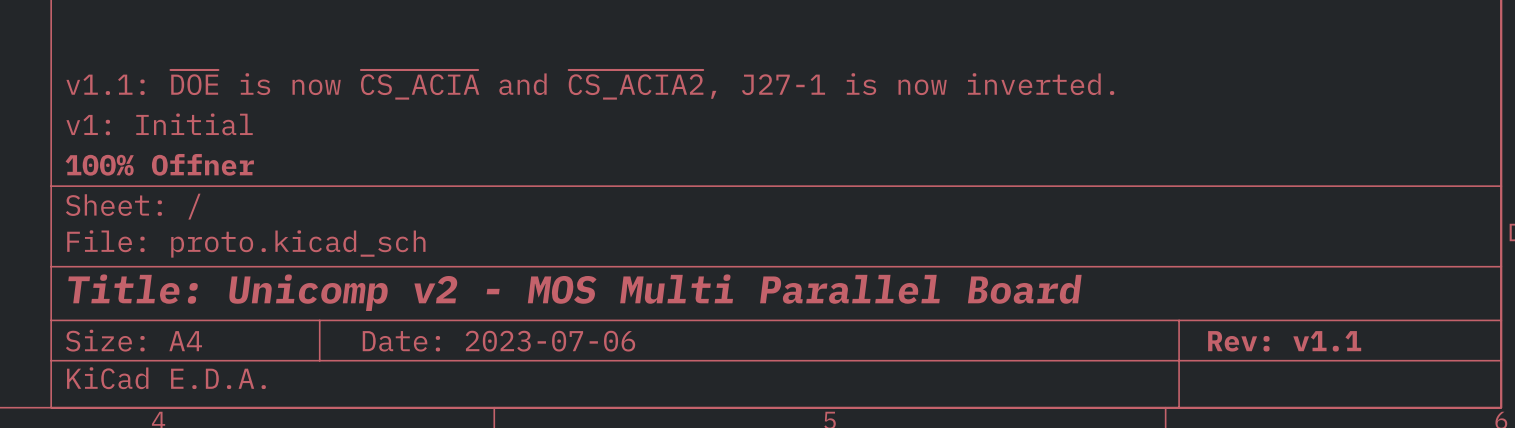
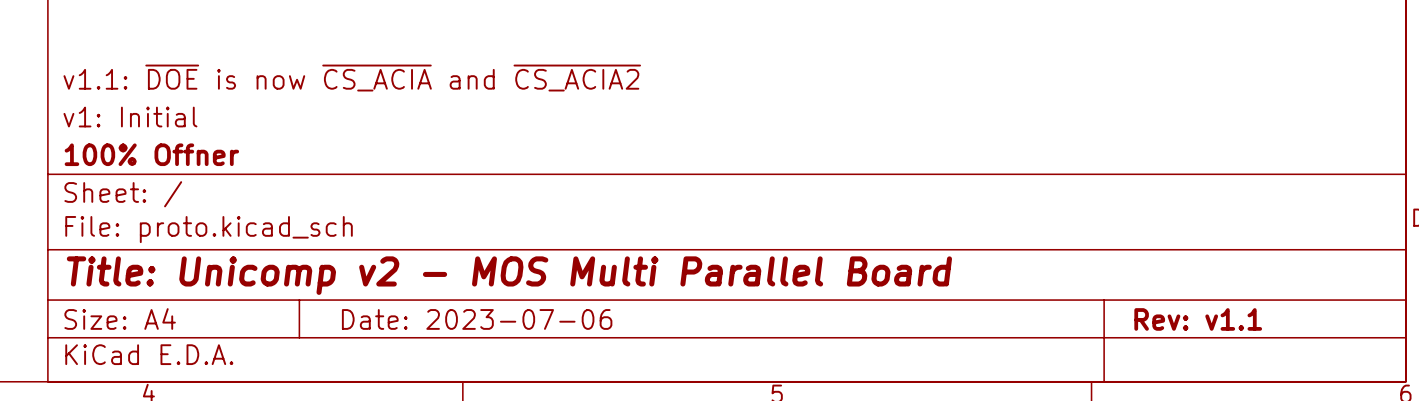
title block: v1.1: ~{DOE} is now ~{CS_ACIA} and ~{CS_ACIA2}, J27-1 is now inverted. (590, 84) -> v1.1: ~{DOE} is now ~{CS_ACIA} and ~{CS_ACIA2} (352, 78)

